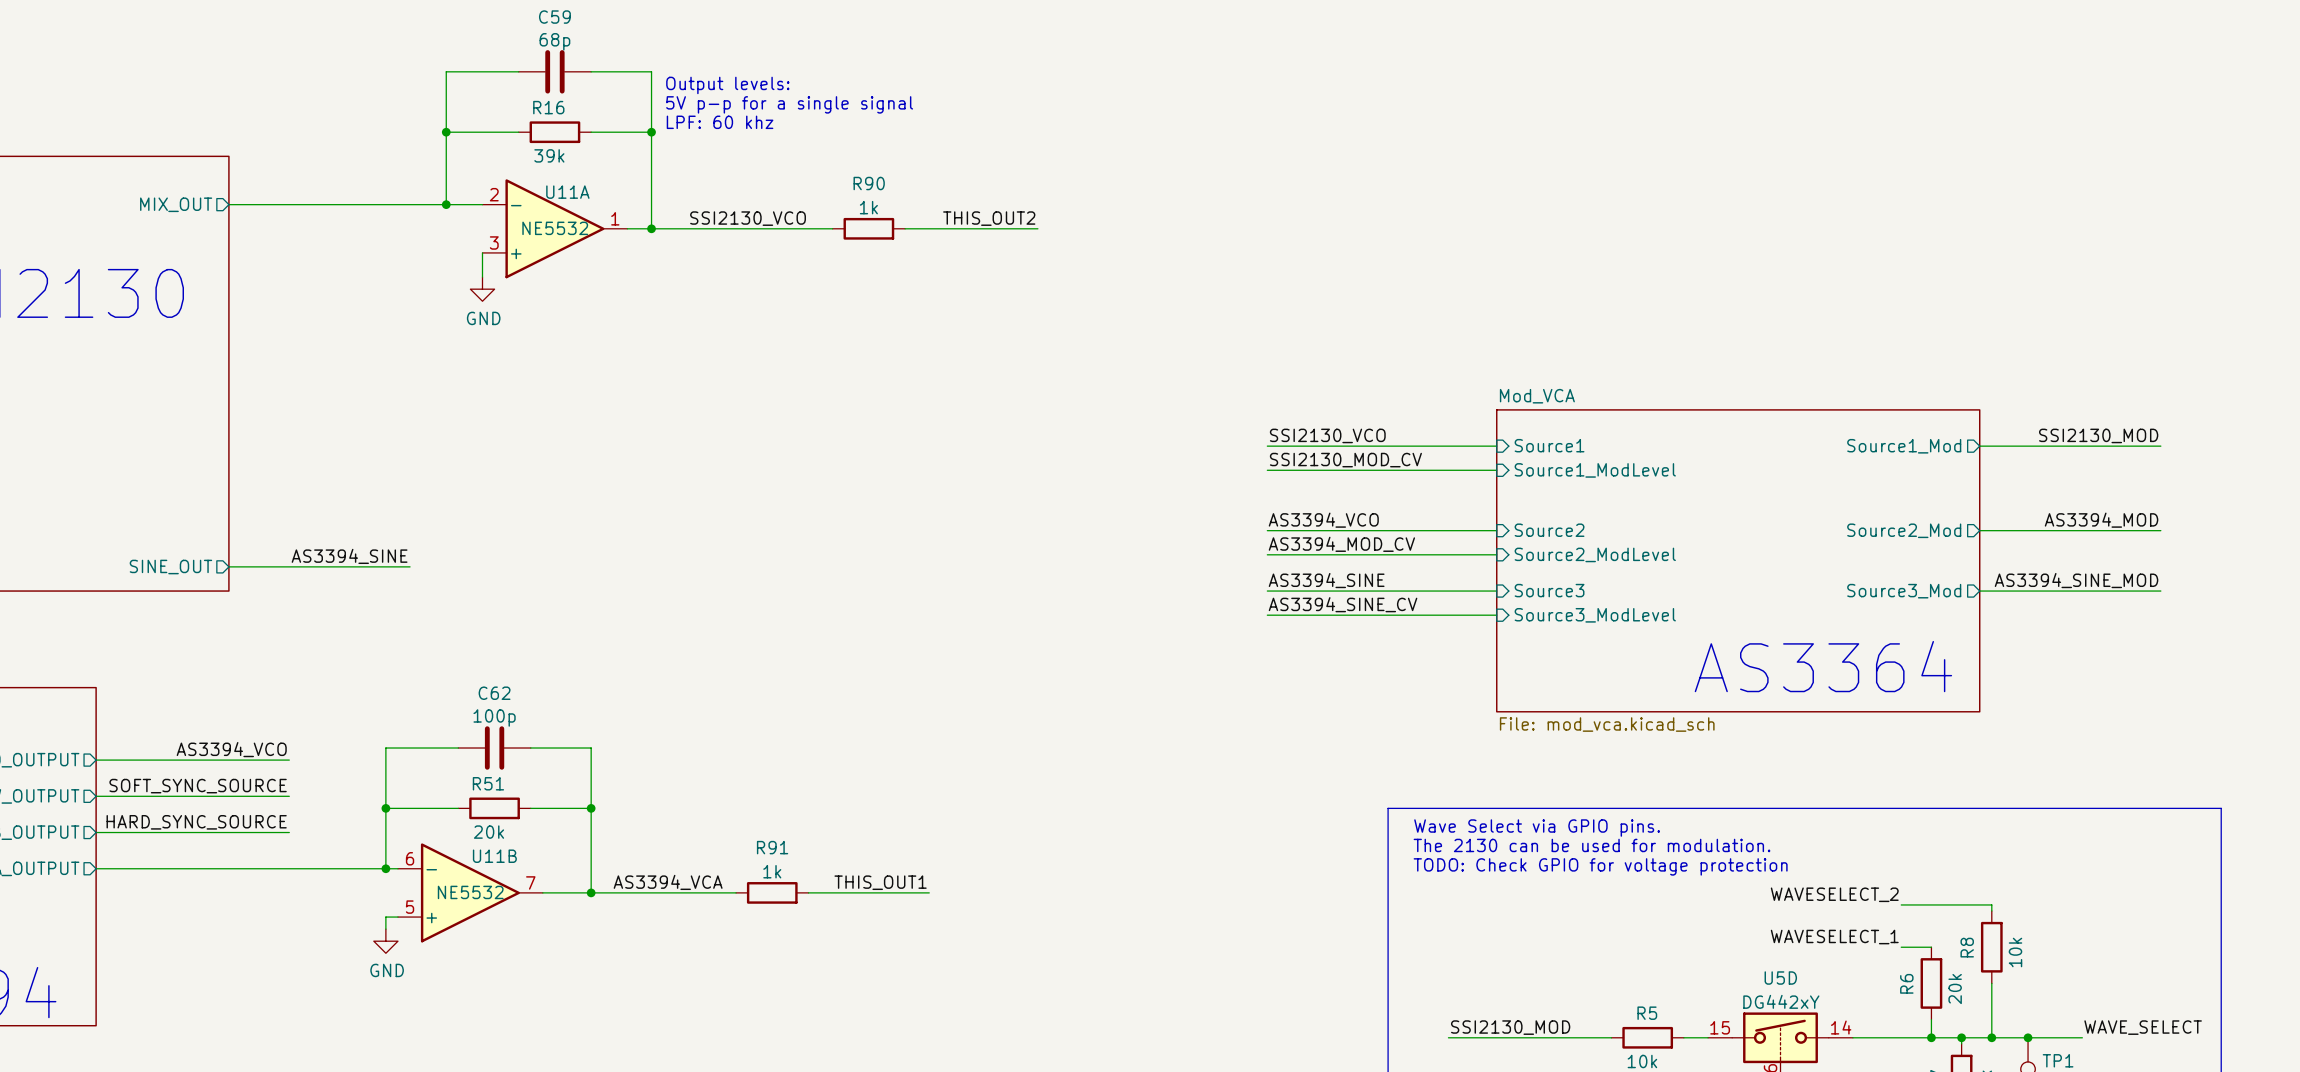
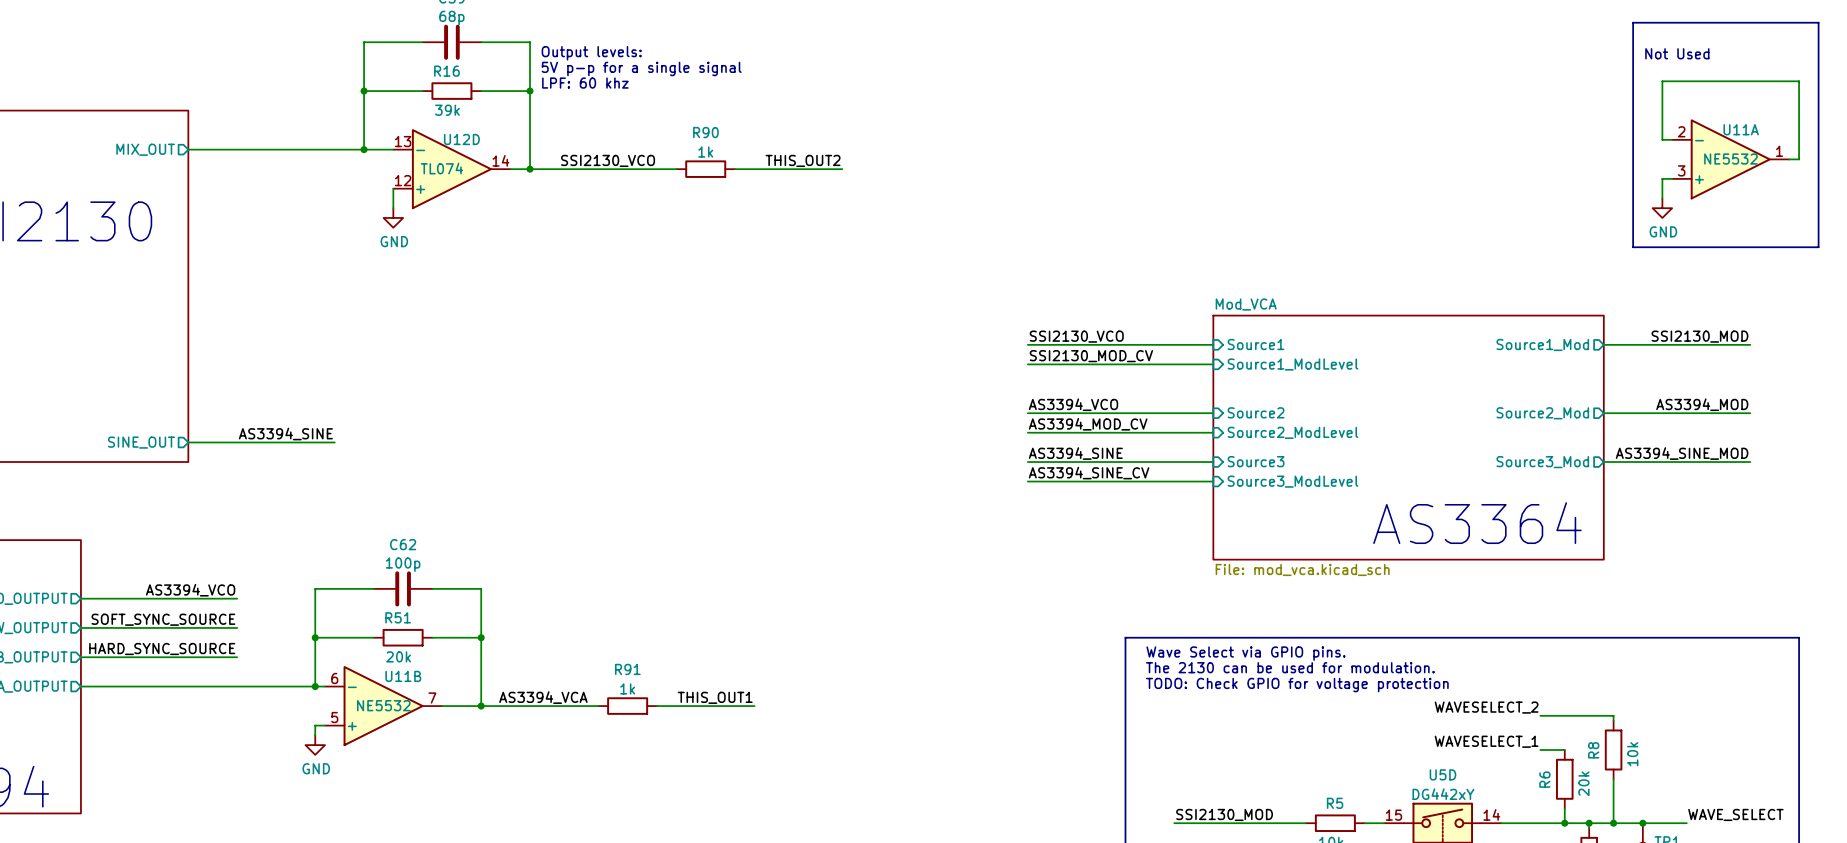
line: none -> (1633, 22) (1818, 22) (1818, 247) (1633, 247) (1633, 22)
text: none -> Not Used (1677, 53)
wire: none -> (1672, 139) (1662, 139) (1662, 81) (1799, 81) (1799, 159) (1789, 159)
U11A position: (554, 228) -> (1730, 159)
U12D: none -> TL074 (451, 169)
wire: none -> (1672, 178) (1662, 178) (1662, 198)
power symbol: none -> GND (1662, 208)

